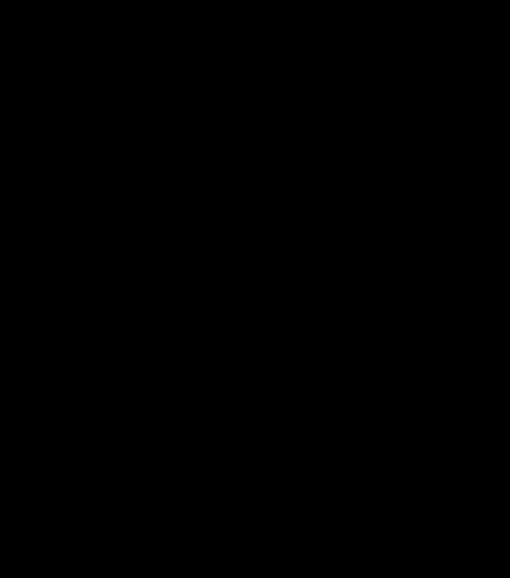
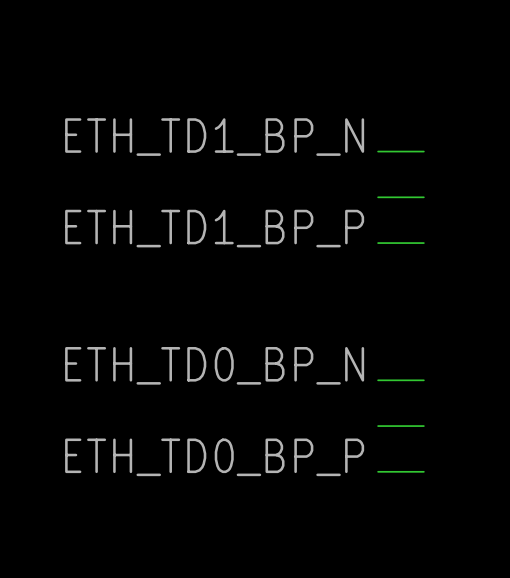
label: none -> ETH_TD1_BP_N (214, 137)
wire: none -> (378, 151) (423, 151)
wire: none -> (378, 197) (423, 197)
label: none -> ETH_TD1_BP_P (214, 228)
wire: none -> (378, 243) (423, 243)
label: none -> ETH_TD0_BP_N (214, 365)
wire: none -> (378, 380) (423, 380)
wire: none -> (378, 426) (423, 426)
label: none -> ETH_TD0_BP_P (214, 457)
wire: none -> (378, 471) (423, 471)

